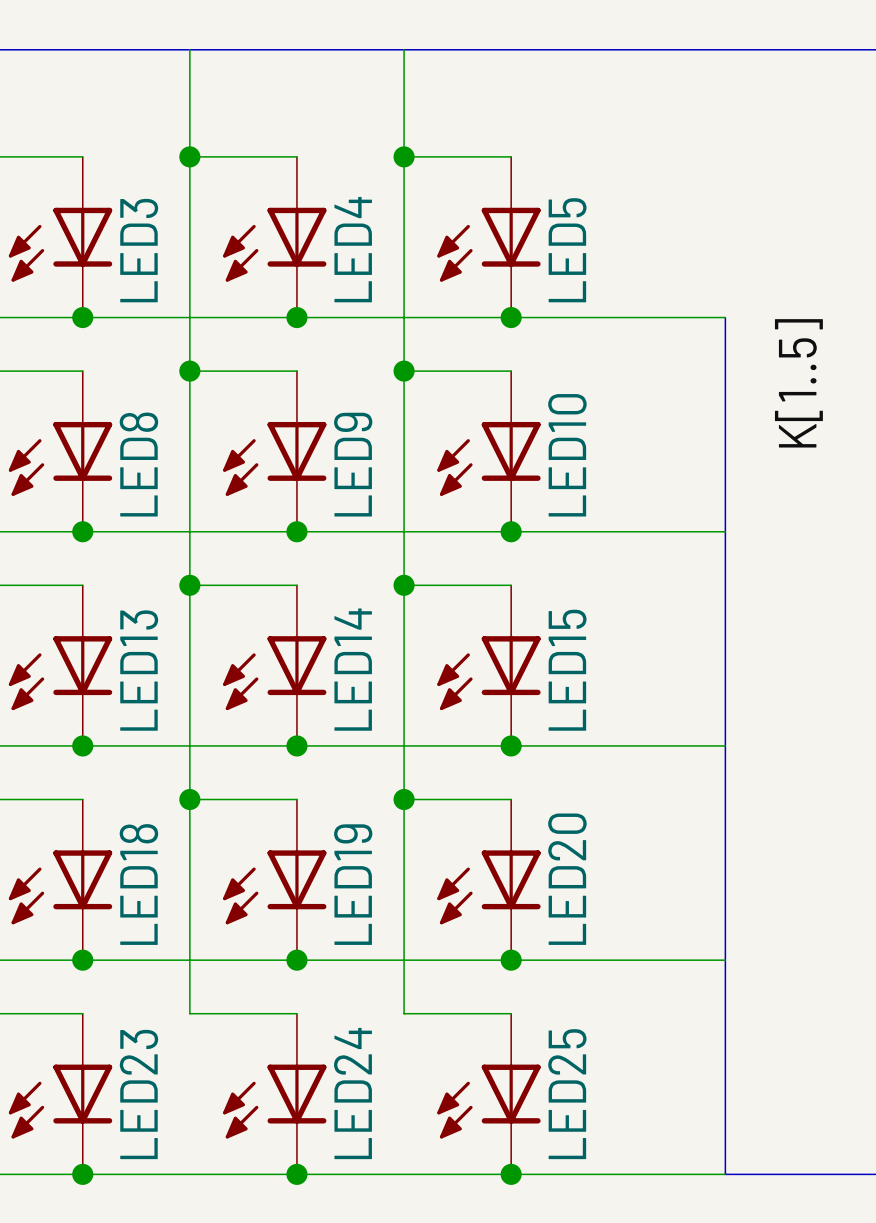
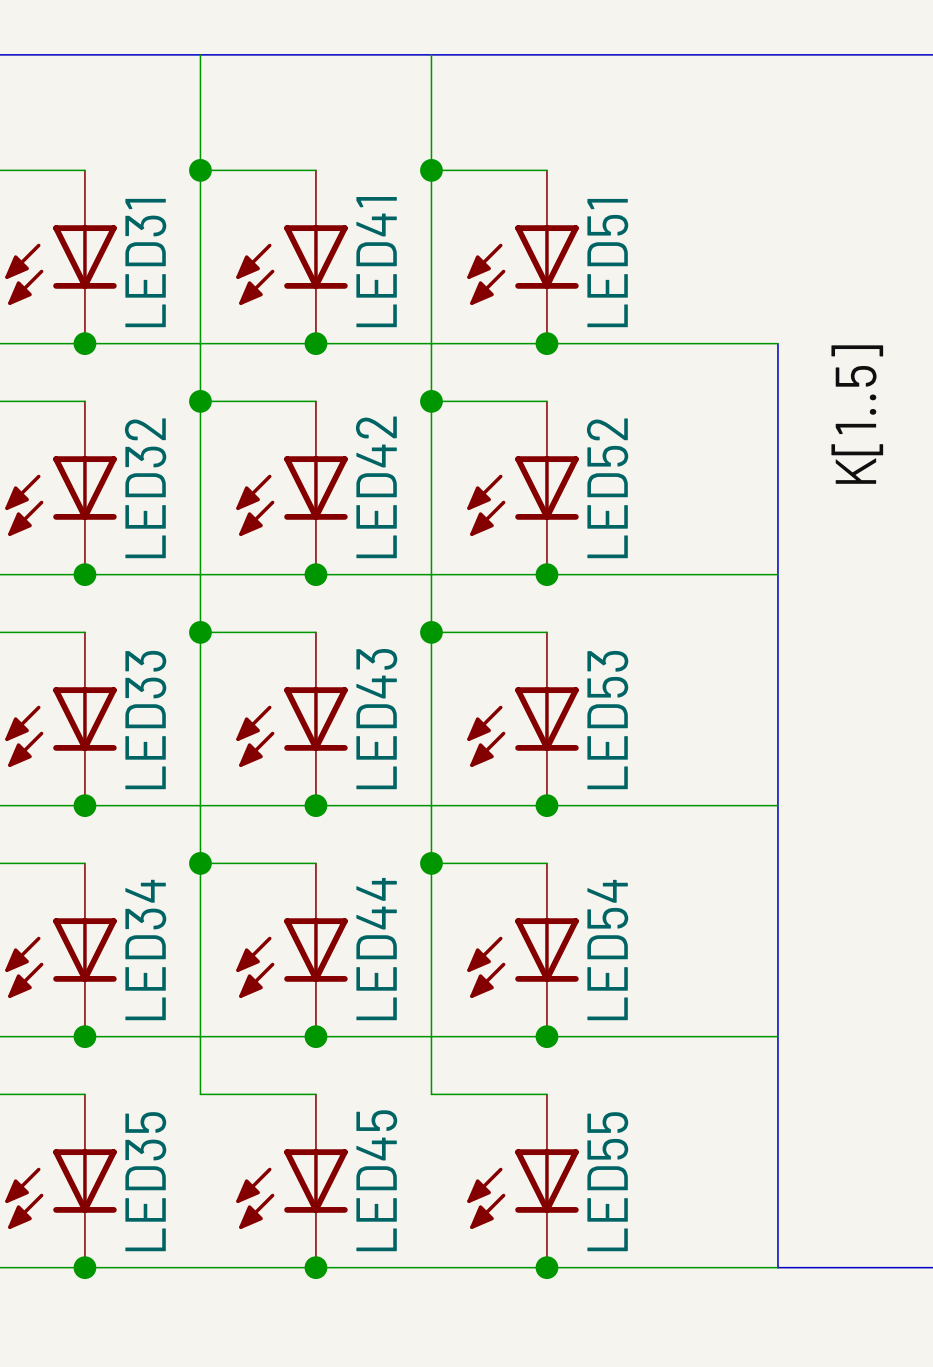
LED4 name: LED4 (353, 249) -> LED41 (376, 262)
LED3 name: LED3 (139, 250) -> LED31 (145, 263)
LED5 name: LED5 (567, 250) -> LED51 (607, 263)
LED10 name: LED10 (567, 455) -> LED52 (607, 488)
LED8 name: LED8 (138, 464) -> LED32 (145, 488)
LED9 name: LED9 (353, 464) -> LED42 (376, 487)
LED14 name: LED14 (353, 669) -> LED43 (376, 719)
LED13 name: LED13 (139, 670) -> LED33 (145, 720)
LED15 name: LED15 (567, 670) -> LED53 (607, 720)
LED20 name: LED20 (567, 879) -> LED54 (607, 950)
LED18 name: LED18 (138, 884) -> LED34 (145, 949)
LED19 name: LED19 (353, 884) -> LED44 (376, 949)
LED24 name: LED24 (352, 1093) -> LED45 (376, 1180)
LED23 name: LED23 (138, 1094) -> LED35 (145, 1181)
LED25 name: LED25 (567, 1094) -> LED55 (607, 1181)

